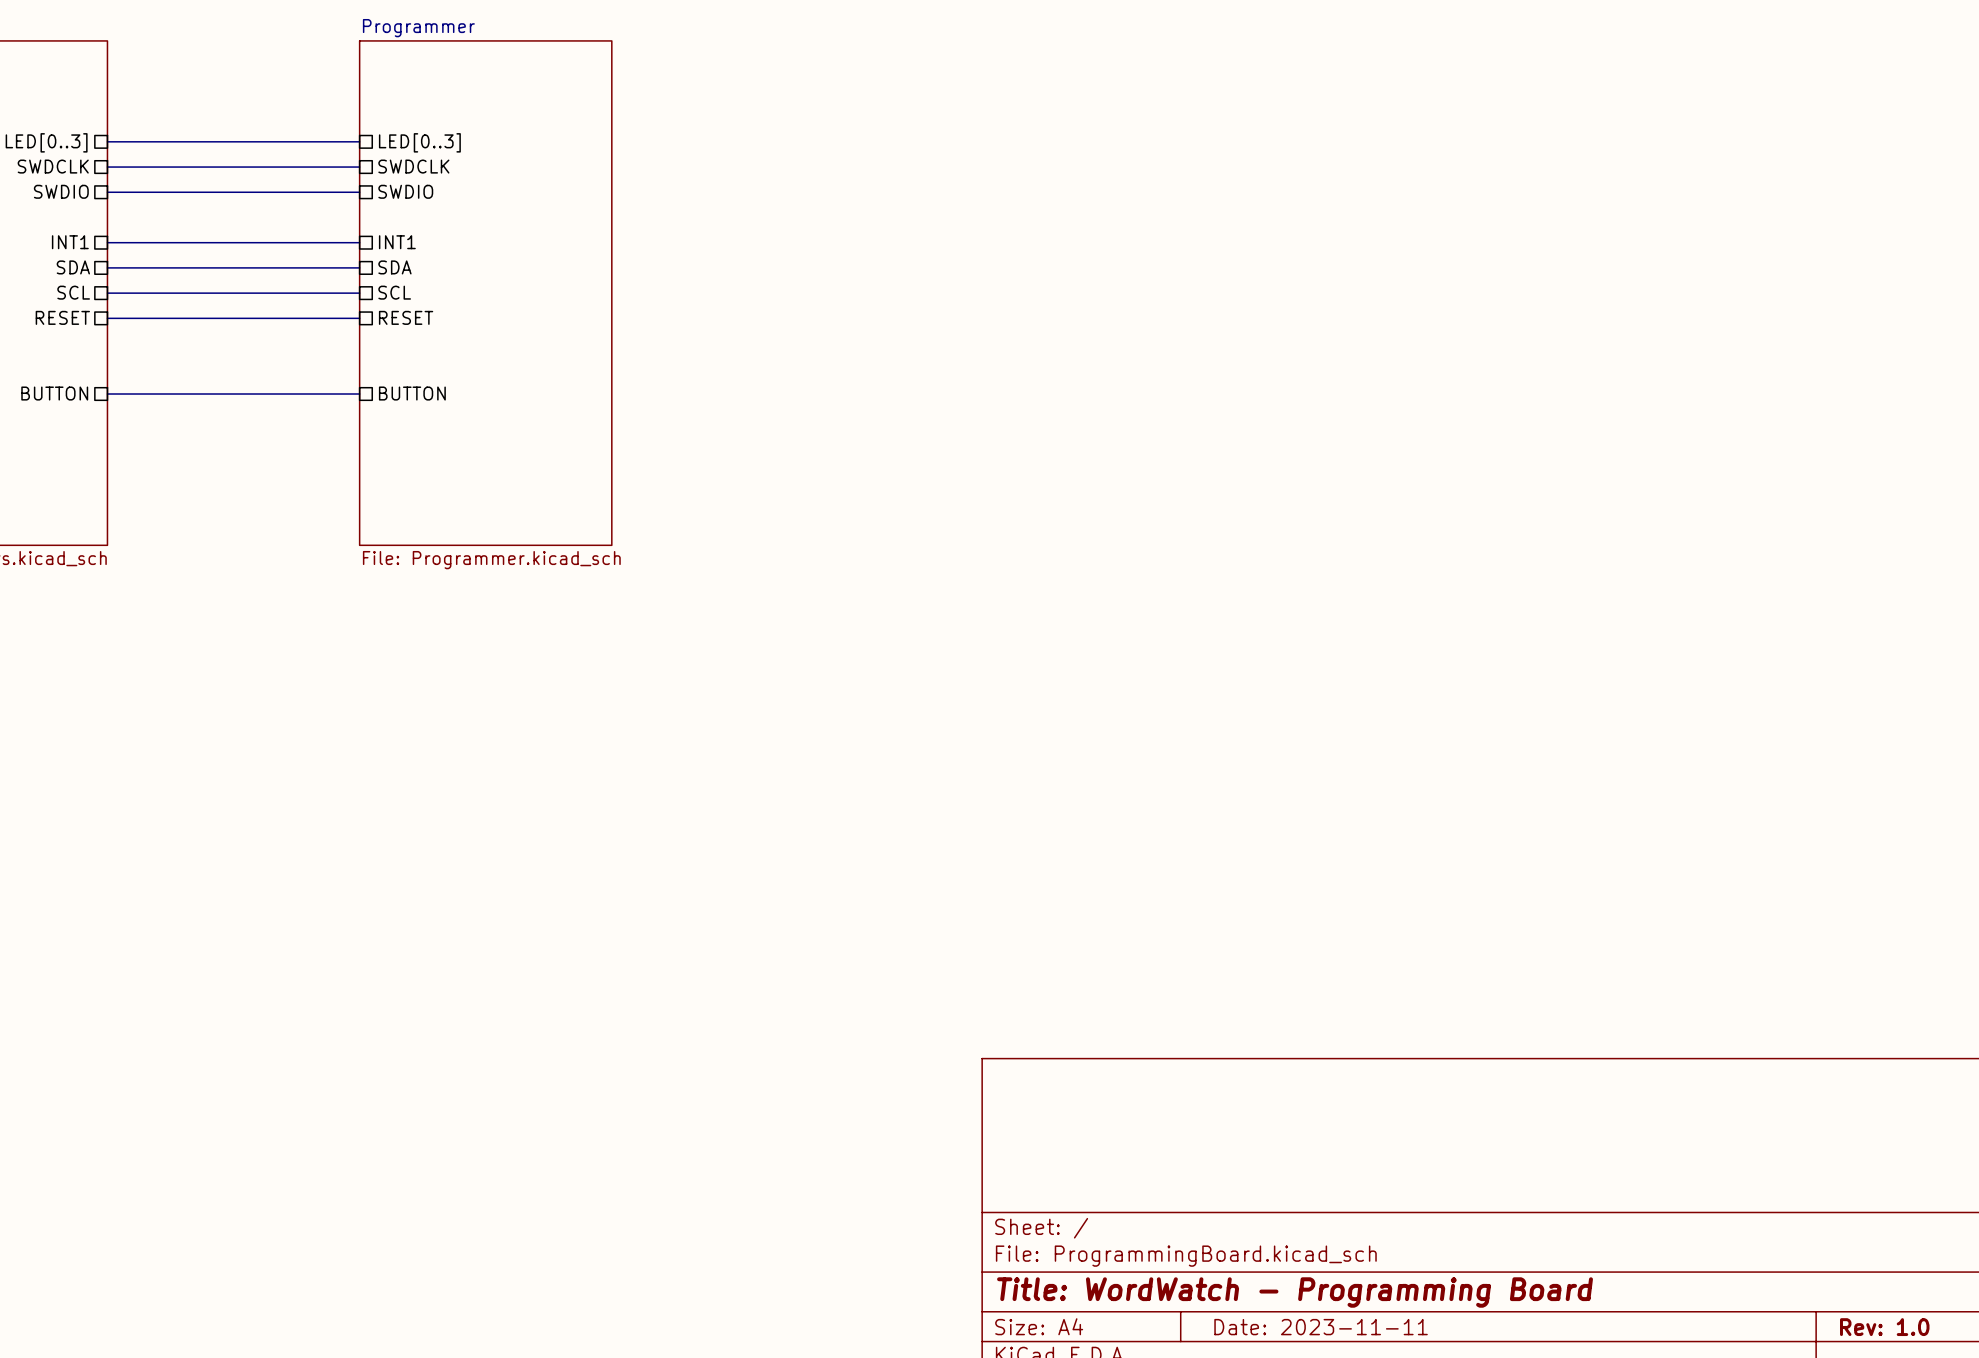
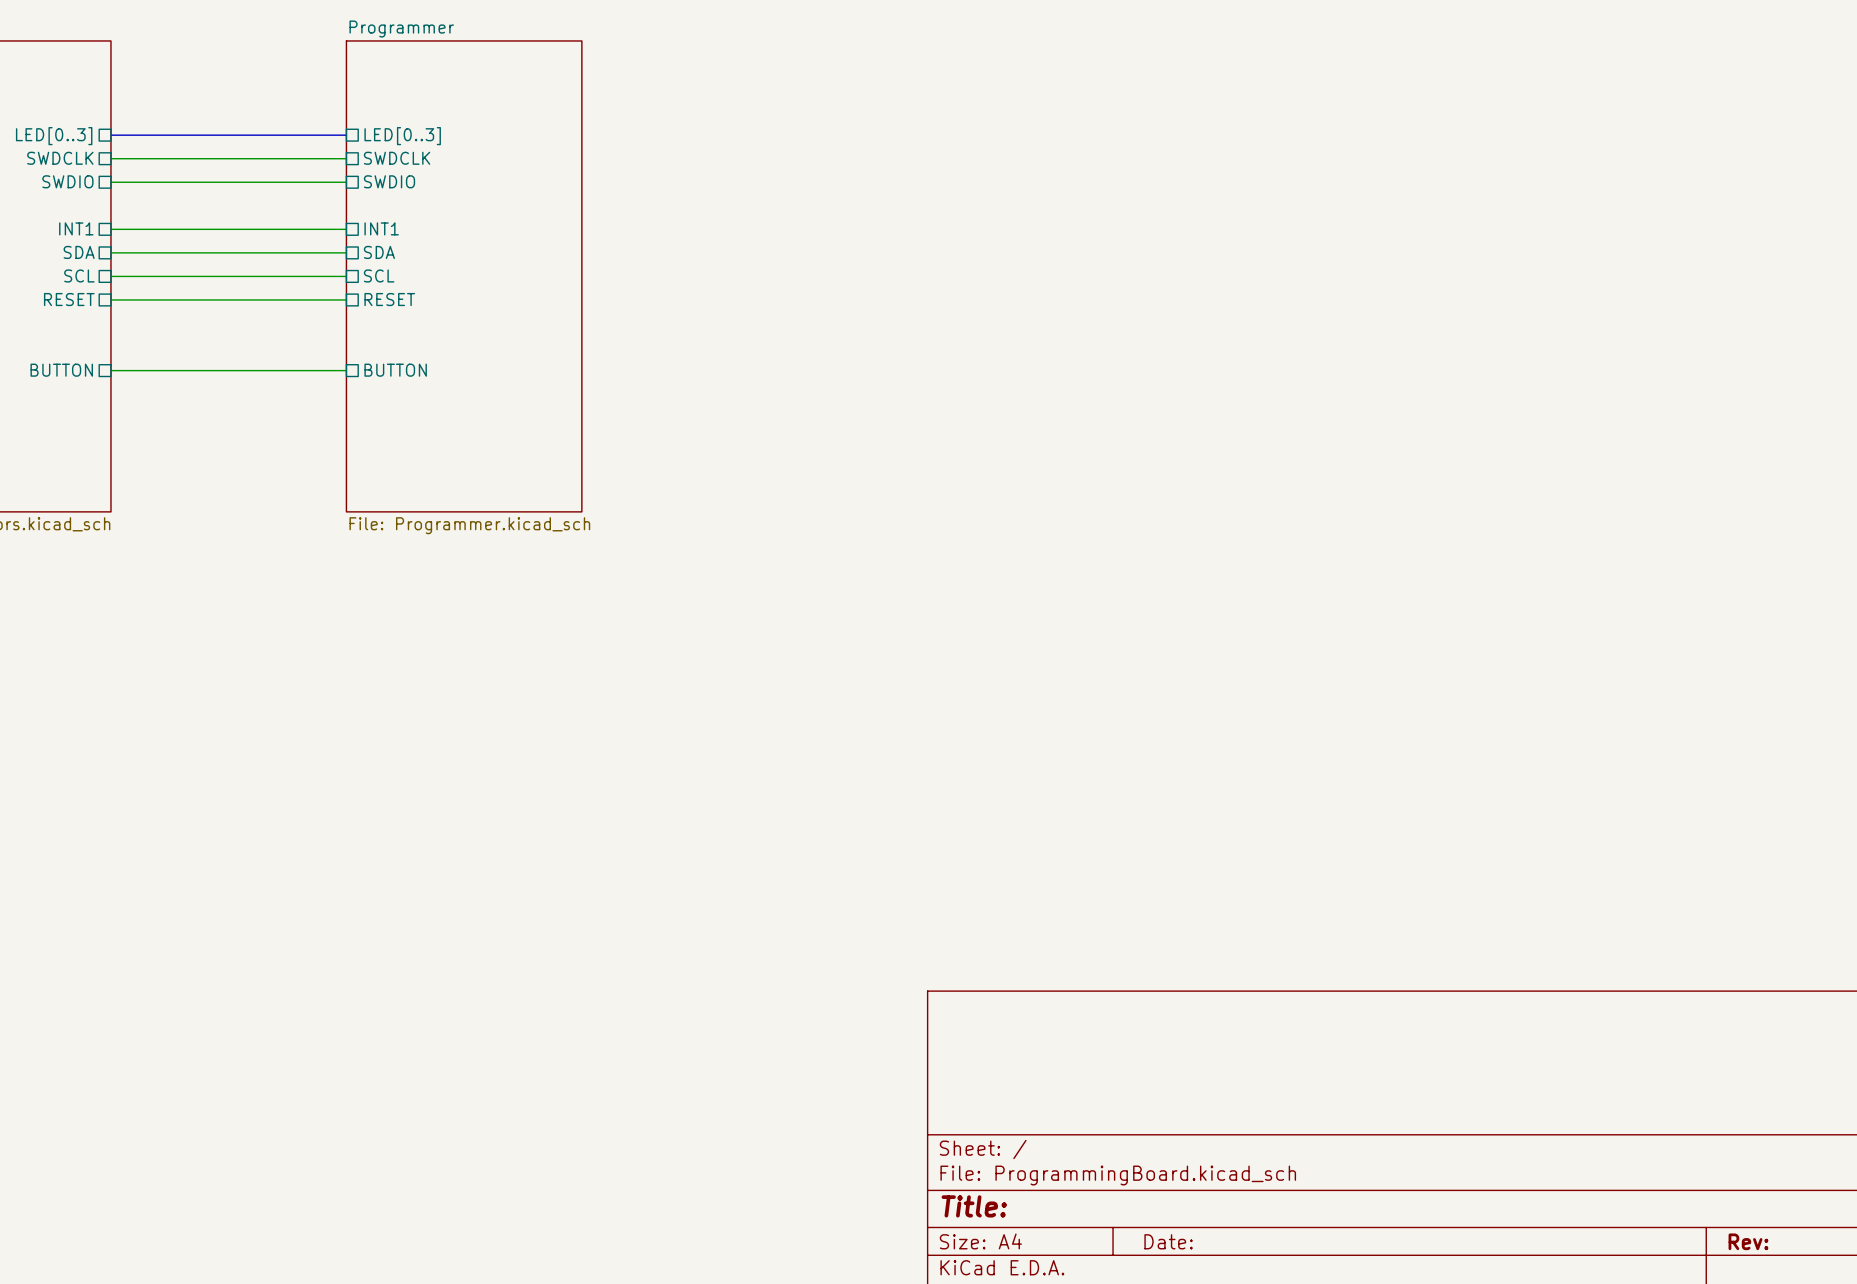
title block: Title: WordWatch - Programming Board (1295, 1292) -> Title: (974, 1206)
title block: Date: 2023-11-11 (1321, 1327) -> Date: (1168, 1241)
title block: Rev: 1.0 (1884, 1327) -> Rev: (1748, 1241)

